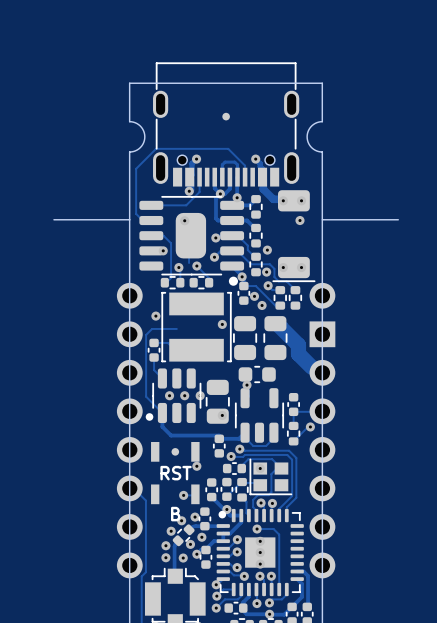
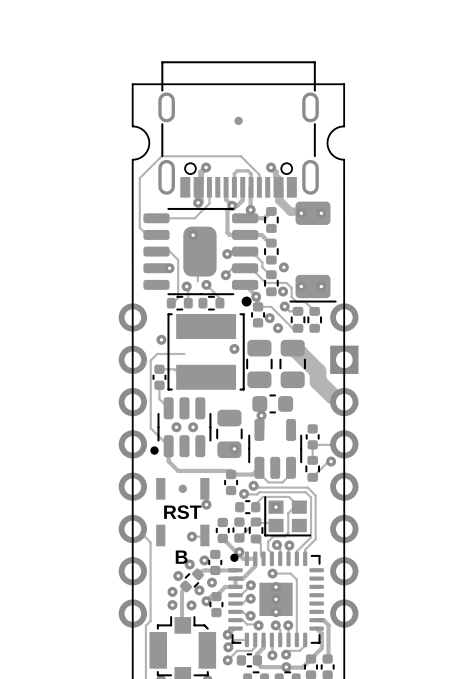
board edge: (53, 219) (129, 219) -> none
board edge: (322, 219) (398, 219) -> none
via: (300, 220) -> none
via: (200, 395) -> none

